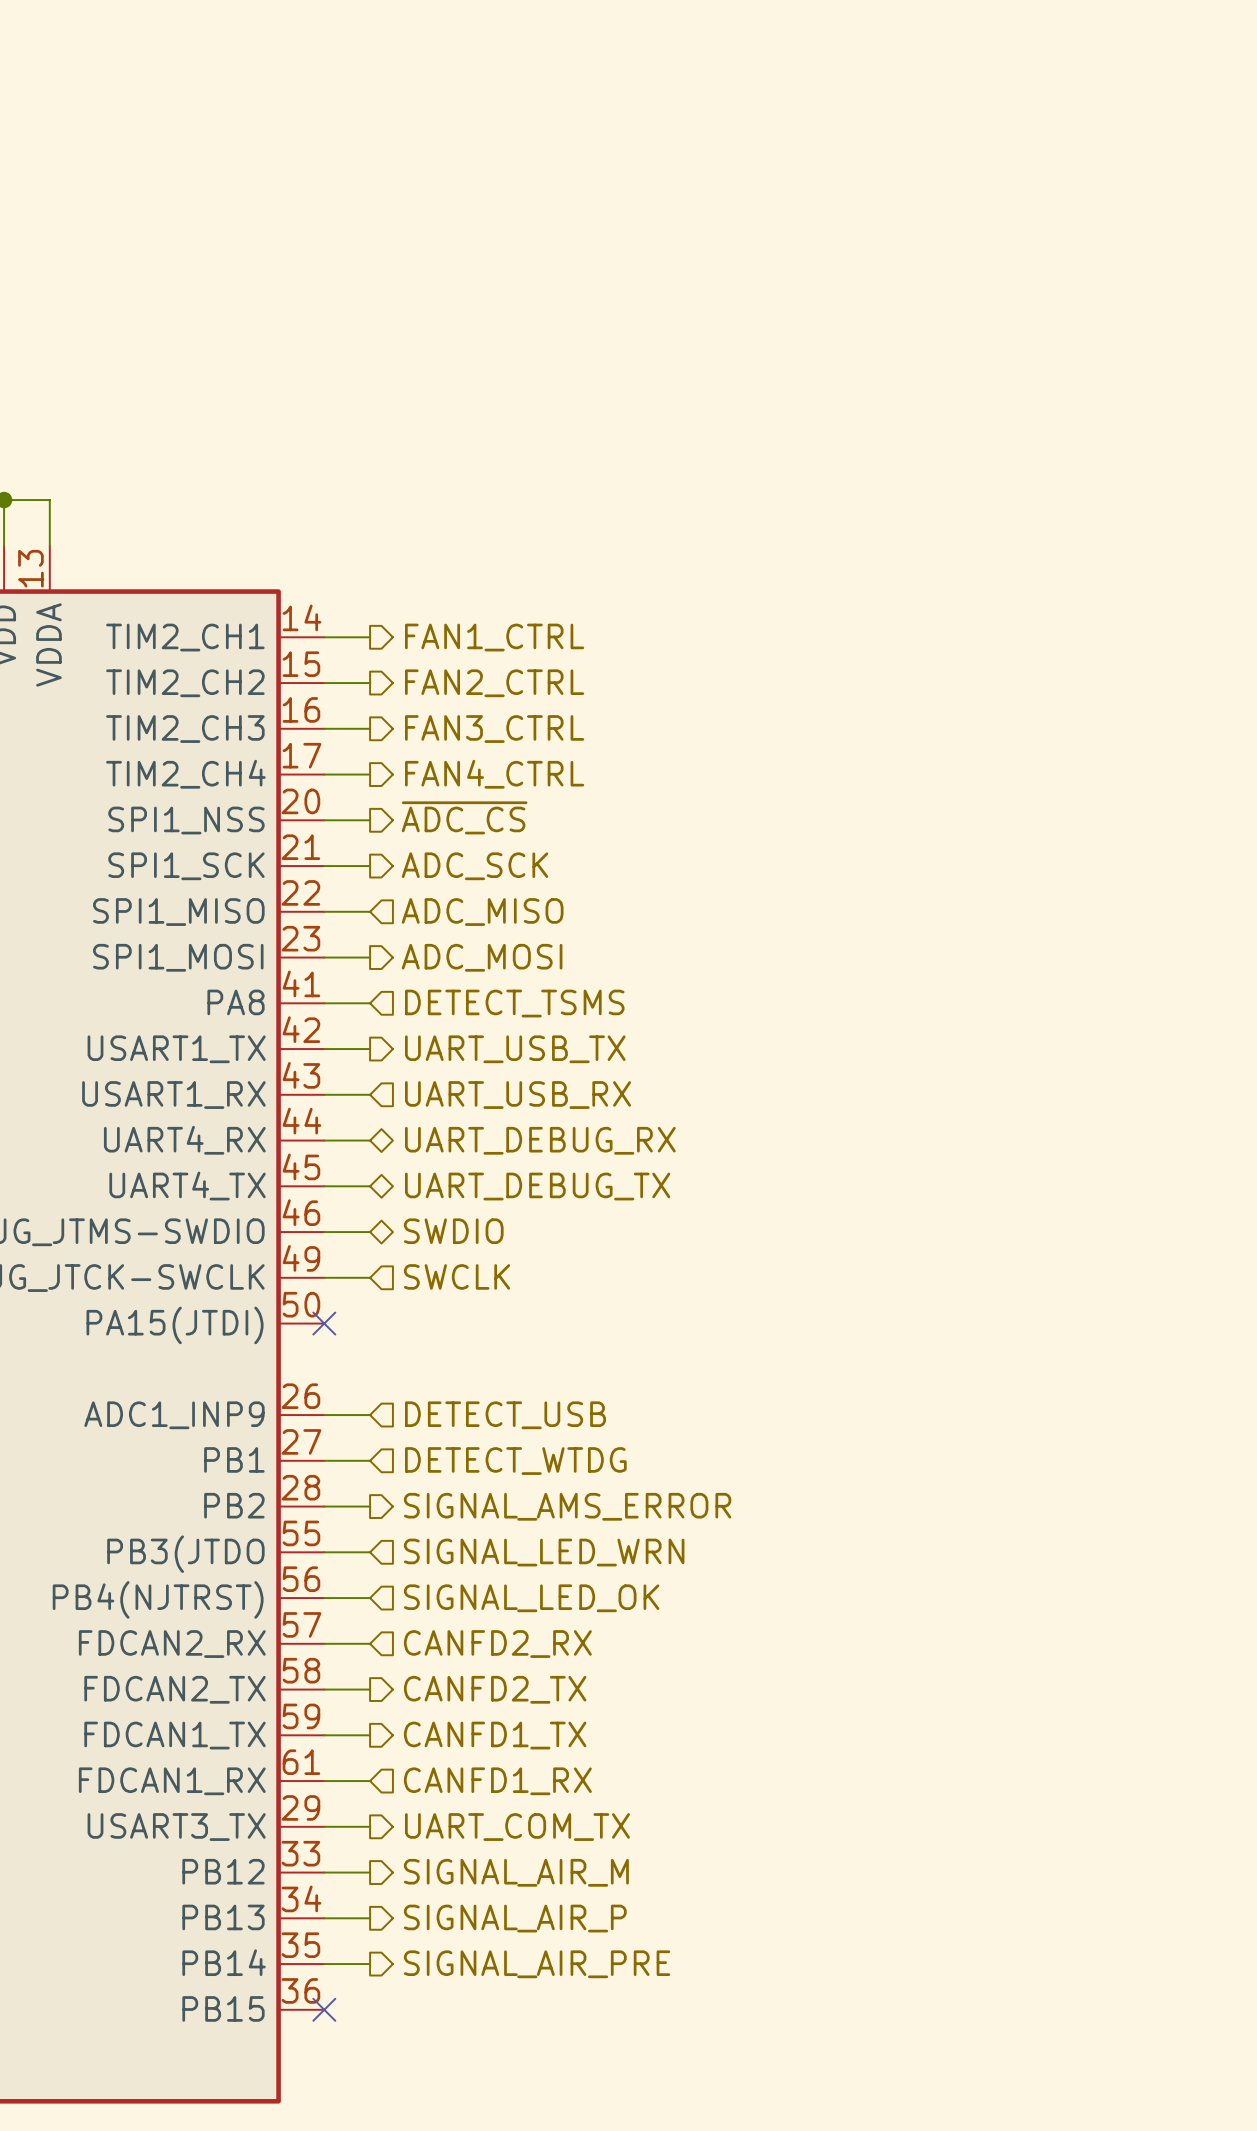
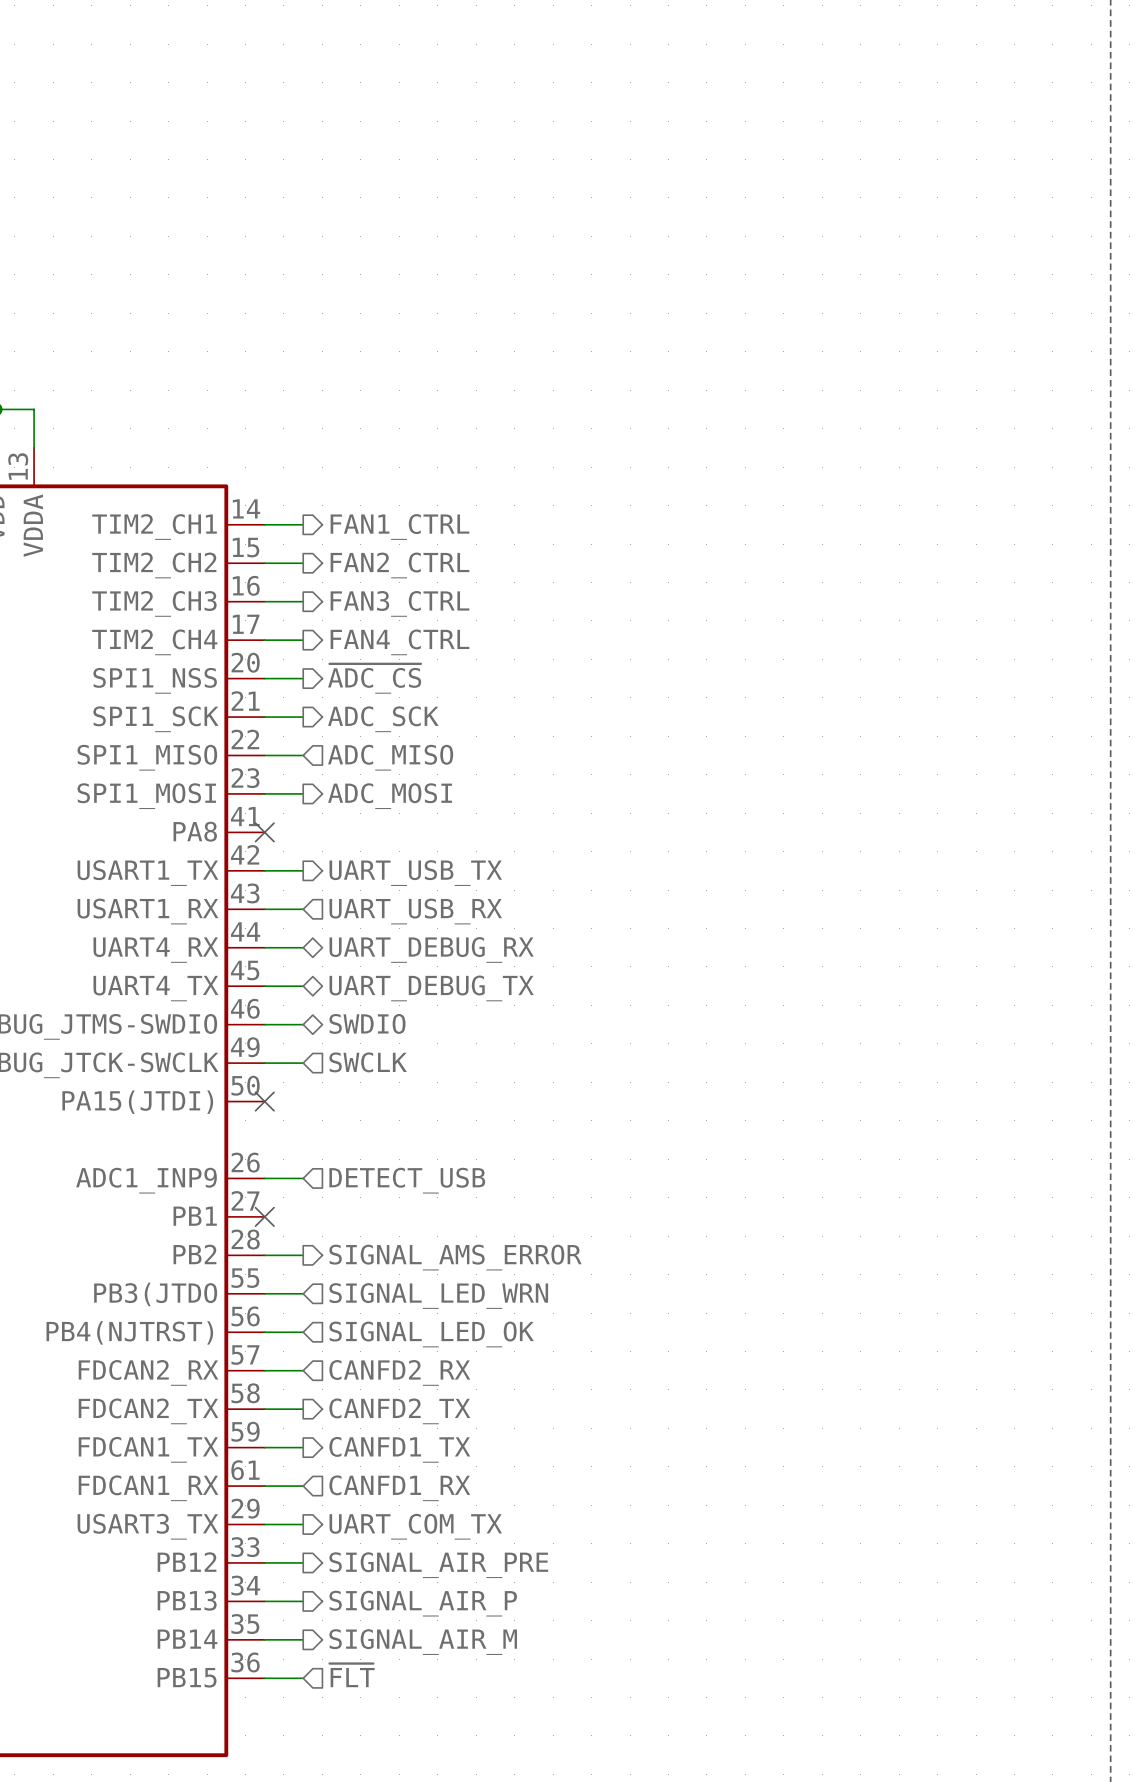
wire: (324, 1003) (370, 1003) -> none
no-connect mark: none -> (264, 832)
hierarchical label: DETECT_TSMS (514, 1003) -> none
wire: (324, 1460) (370, 1460) -> none
no-connect mark: none -> (264, 1216)
hierarchical label: DETECT_WTDG (515, 1461) -> none
hierarchical label: SIGNAL_AIR_M (516, 1872) -> SIGNAL_AIR_PRE (438, 1565)
hierarchical label: SIGNAL_AIR_PRE (537, 1964) -> SIGNAL_AIR_M (423, 1642)
hierarchical label: none -> ~{FLT} (352, 1675)
wire: none -> (264, 1678) (303, 1678)
no-connect mark: (324, 2009) -> none

